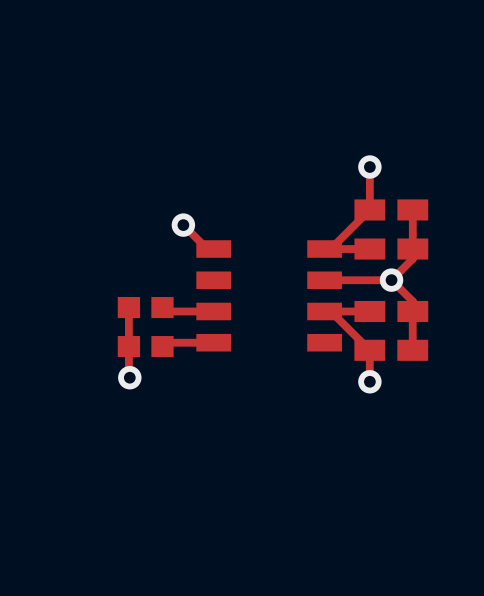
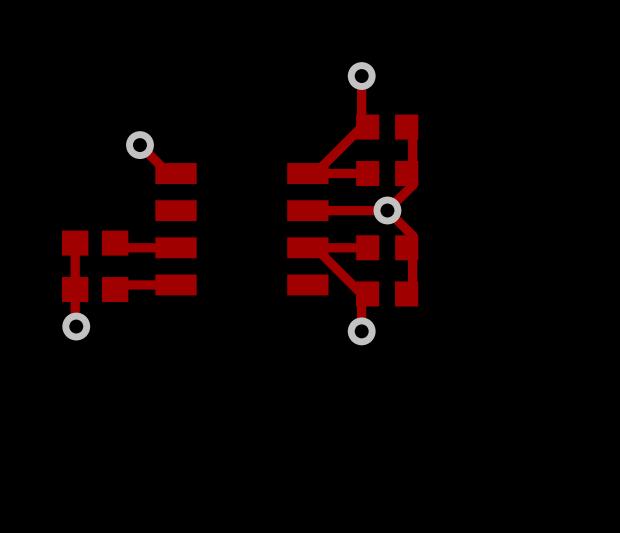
part footprint: [354, 199, 429, 221] -> [356, 114, 419, 140]
part footprint: [354, 238, 429, 260] -> [356, 160, 419, 187]
part footprint: [354, 300, 429, 323] -> [356, 235, 419, 261]
part footprint: [354, 339, 429, 361] -> [356, 281, 419, 307]

